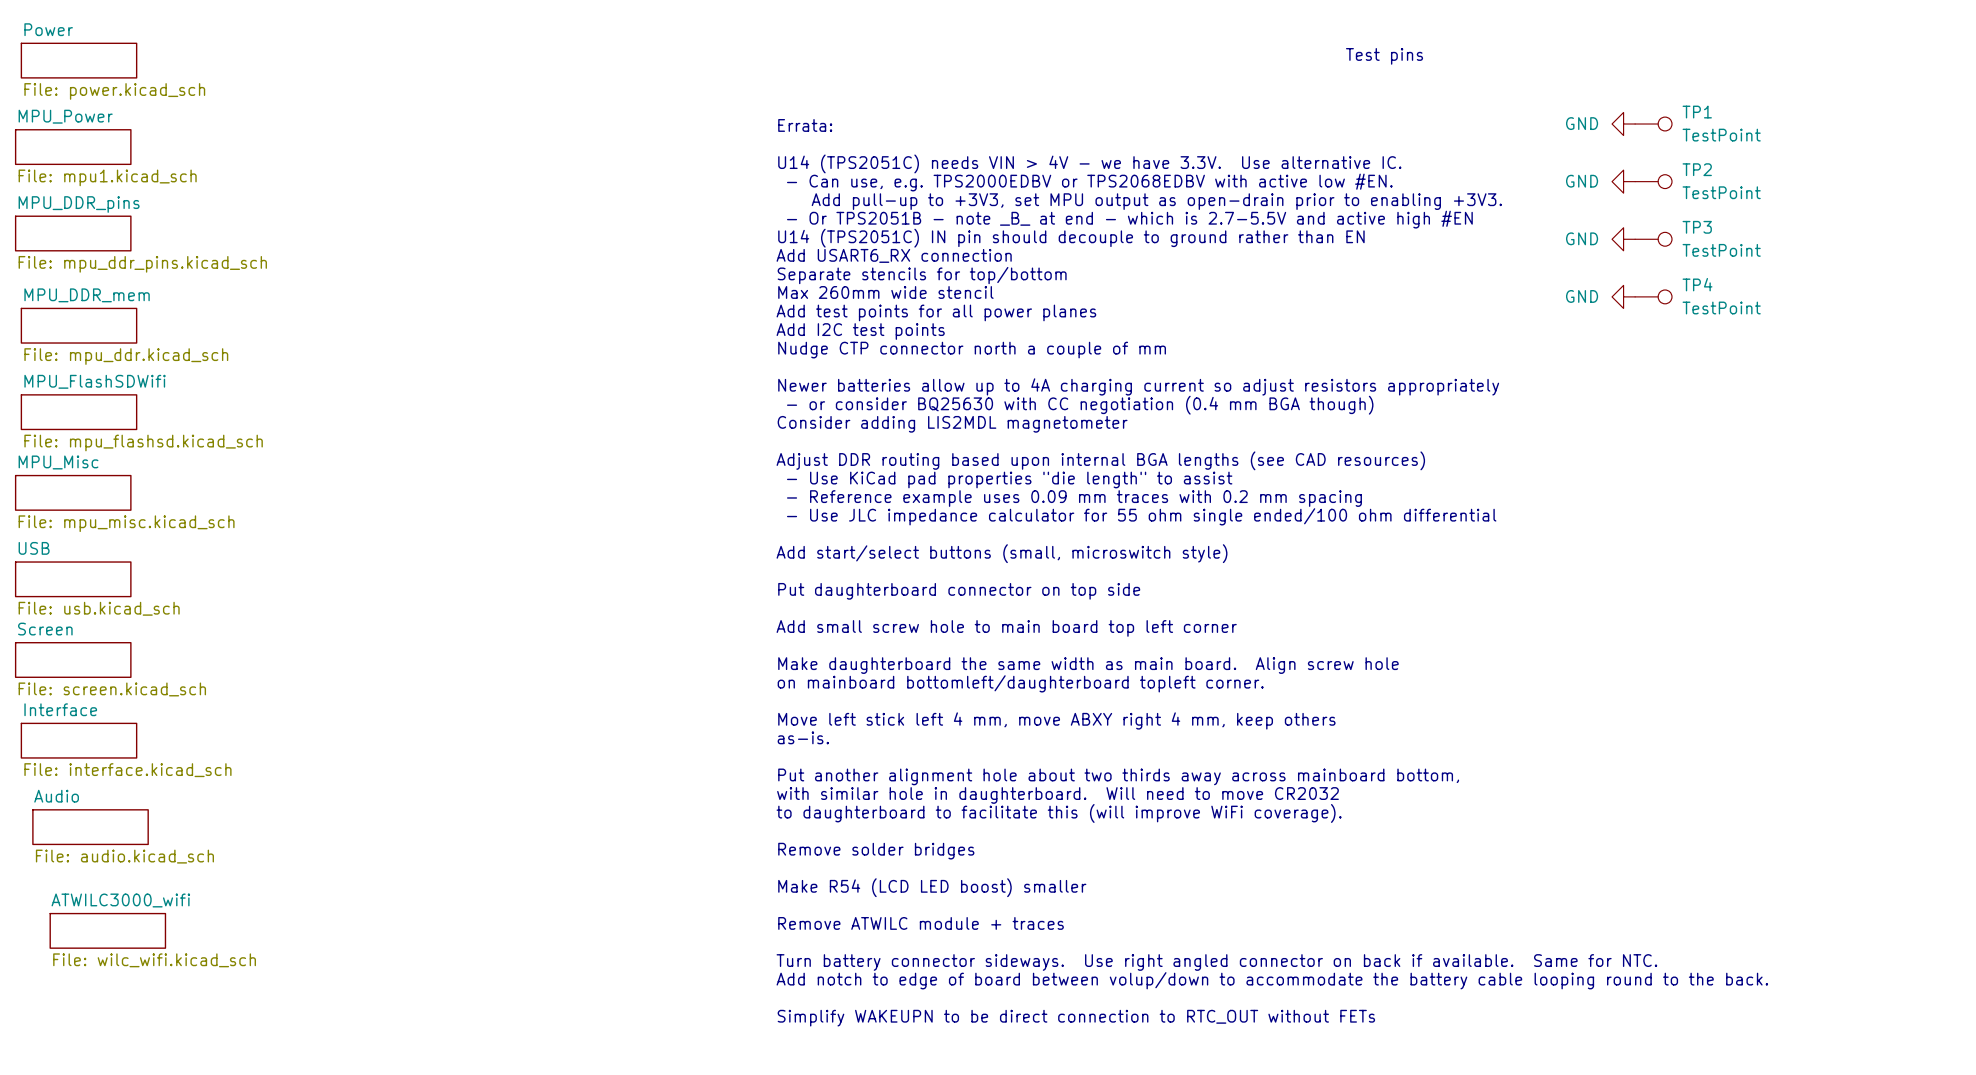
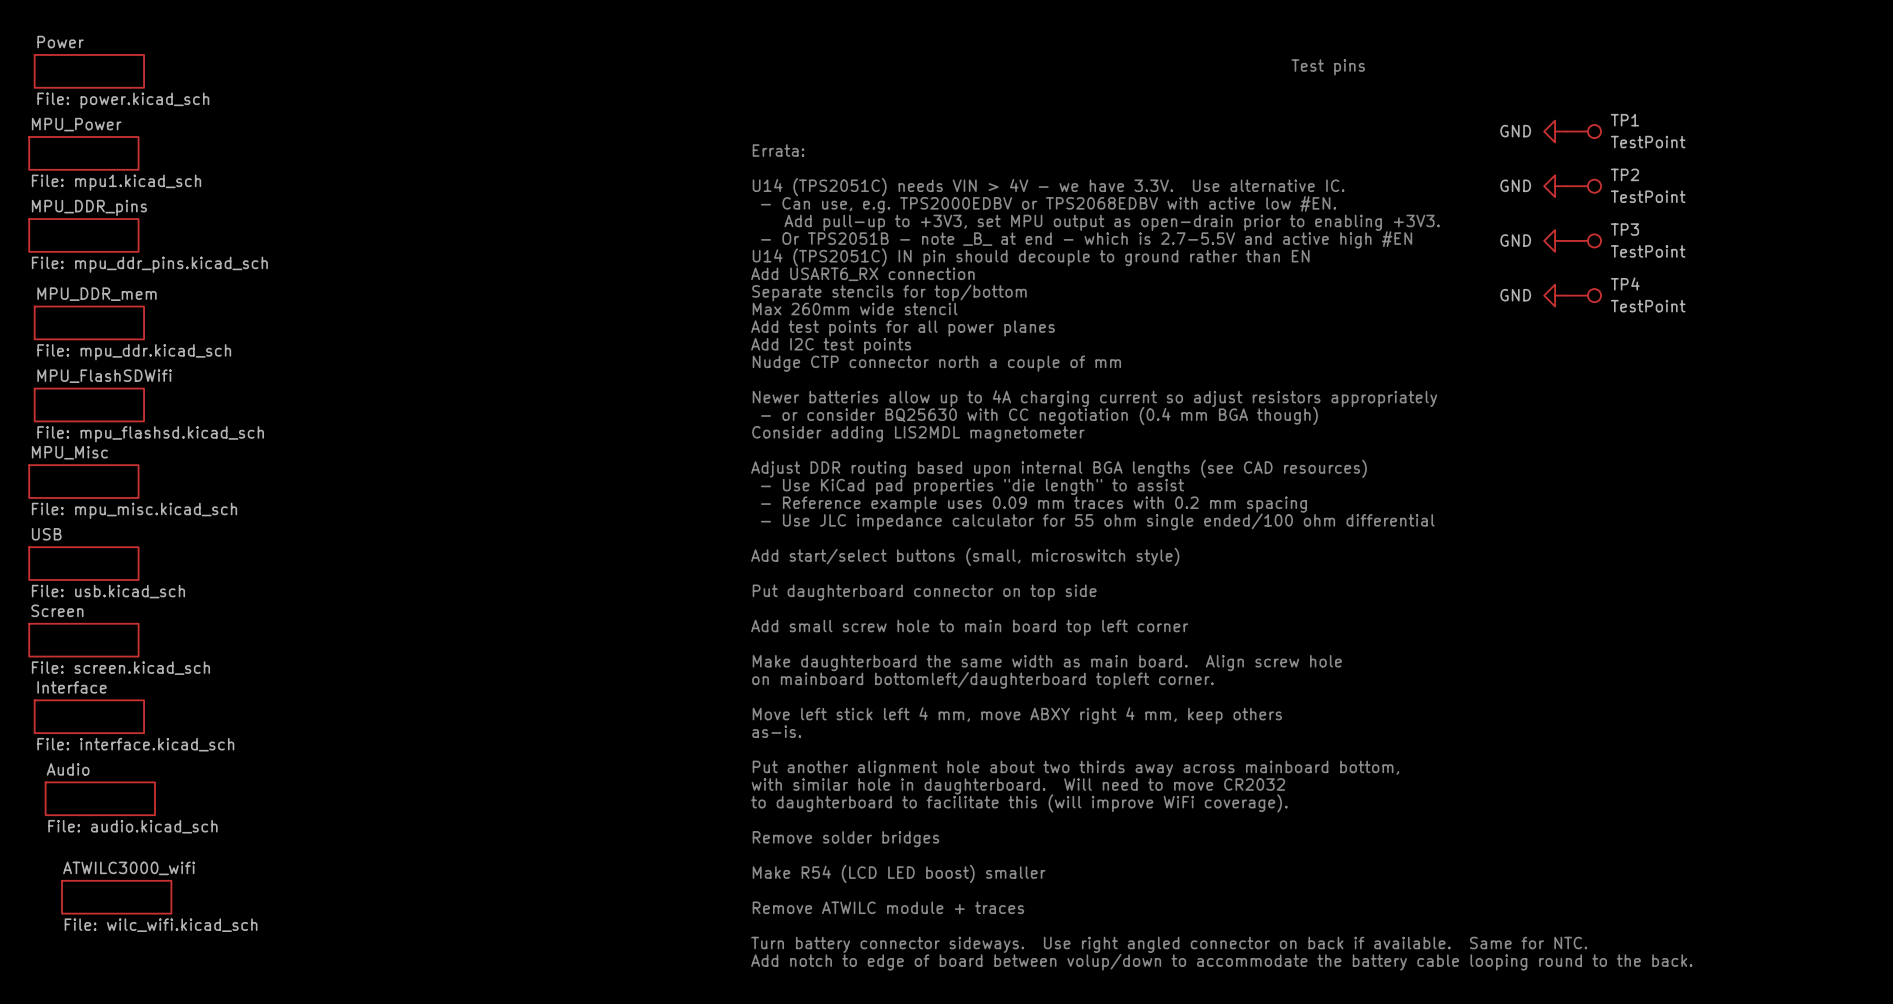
text position: Errata: (805, 125) -> Errata: (778, 150)
text: U14 (TPS2051C) needs VIN > 4V - we have 3.3V. Use alternative IC. (1089, 163) -> none
text: - Can use, e.g. TPS2000EDBV or TPS2068EDBV with active low #EN. (1089, 182) -> U14 (TPS2051C) needs VIN > 4V - we have 3.3V. Use alternative IC. (1048, 187)
text: Add pull-up to +3V3, set MPU output as open-drain prior to enabling +3V3. (1156, 201) -> - Can use, e.g. TPS2000EDBV or TPS2068EDBV with active low #EN. (1048, 204)
text: - Or TPS2051B - note _B_ at end - which is 2.7-5.5V and active high #EN (1129, 219) -> Add pull-up to +3V3, set MPU output as open-drain prior to enabling +3V3. (1112, 222)
text: U14 (TPS2051C) IN pin should decouple to ground rather than EN (1071, 238) -> - Or TPS2051B - note _B_ at end - which is 2.7-5.5V and active high #EN (1086, 239)
text: Add USART6_RX connection (894, 255) -> U14 (TPS2051C) IN pin should decouple to ground rather than EN (1031, 257)
text: Separate stencils for top/bottom (922, 275) -> Add USART6_RX connection (862, 274)
text: Max 260mm wide stencil (885, 292) -> Separate stencils for top/bottom (889, 292)
text: Add test points for all power planes (936, 312) -> Max 260mm wide stencil (855, 309)
text: Add I2C test points (860, 331) -> Add test points for all power planes (903, 328)
text: Nudge CTP connector north a couple of mm (972, 350) -> Add I2C test points (831, 346)
text: none -> Nudge CTP connector north a couple of mm (936, 363)
text: Newer batteries allow up to 4A charging current so adjust resistors appropriately (1138, 386) -> none
text: - or consider BQ25630 with CC negotiation (0.4 mm BGA though) (1080, 405) -> Newer batteries allow up to 4A charging current so adjust resistors appropriately (1094, 398)
text: Consider adding LIS2MDL magnetometer (952, 424) -> - or consider BQ25630 with CC negotiation (0.4 mm BGA though) (1039, 415)
text: none -> Consider adding LIS2MDL magnetometer (918, 434)
text: Adjust DDR routing based upon internal BGA lengths (see CAD resources) (1100, 460) -> none
text: - Use KiCad pad properties "die length" to assist (1009, 479) -> Adjust DDR routing based upon internal BGA lengths (see CAD resources) (1059, 468)
text: - Reference example uses 0.09 mm traces with 0.2 mm spacing (1074, 498) -> - Use KiCad pad properties "die length" to assist (972, 486)
text: - Use JLC impedance calculator for 55 ohm single ended/100 ohm differential (1141, 516) -> - Reference example uses 0.09 mm traces with 0.2 mm spacing (1034, 504)
text: none -> - Use JLC impedance calculator for 55 ohm single ended/100 ohm differential (1097, 521)
text position: Add start/select buttons (small, microswitch style) (1002, 553) -> Add start/select buttons (small, microswitch style) (965, 556)
text position: Put daughterboard connector on top side (959, 591) -> Put daughterboard connector on top side (924, 592)
text position: Add small screw hole to main board top left corner (1006, 628) -> Add small screw hole to main board top left corner (969, 627)
text: Make daughterboard the same width as main board. Align screw hole (1088, 665) -> none
text: on mainboard bottomleft/daughterboard topleft corner. (1020, 683) -> Make daughterboard the same width as main board. Align screw hole (1047, 663)
text: none -> on mainboard bottomleft/daughterboard topleft corner. (982, 680)
text: Move left stick left 4 mm, move ABXY right 4 mm, keep others (1056, 720) -> none
text: as-is. (803, 737) -> Move left stick left 4 mm, move ABXY right 4 mm, keep others (1017, 715)
text: none -> as-is. (776, 731)
text: Put another alignment hole about two thirds away across mainboard bottom, (1118, 776) -> none
text: with similar hole in daughterboard. Will need to move CR2032 (1057, 795) -> Put another alignment hole about two thirds away across mainboard bottom, (1075, 768)
text: to daughterboard to facilitate this (will improve WiFi coverage). (1059, 813) -> with similar hole in daughterboard. Will need to move CR2032 (1018, 786)
text: none -> to daughterboard to facilitate this (will improve WiFi coverage). (1019, 803)
text position: Remove solder bridges (876, 851) -> Remove solder bridges (845, 839)
text position: Make R54 (LCD LED boost) smaller (932, 887) -> Make R54 (LCD LED boost) smaller (899, 873)
text position: Remove ATWILC module + traces (921, 923) -> Remove ATWILC module + traces (888, 907)
text: Turn battery connector sideways. Use right angled connector on back if available. Same for NTC. (1216, 962) -> none
text: Add notch to edge of board between volup/down to accommodate the battery cable looping round to the back. (1272, 980) -> Turn battery connector sideways. Use right angled connector on back if available. Same for NTC. (1169, 944)
text: none -> Add notch to edge of board between volup/down to accommodate the battery cable looping round to the back. (1221, 962)
text: Simplify WAKEUPN to be direct connection to RTC_OUT without FETs (1076, 1018) -> none

